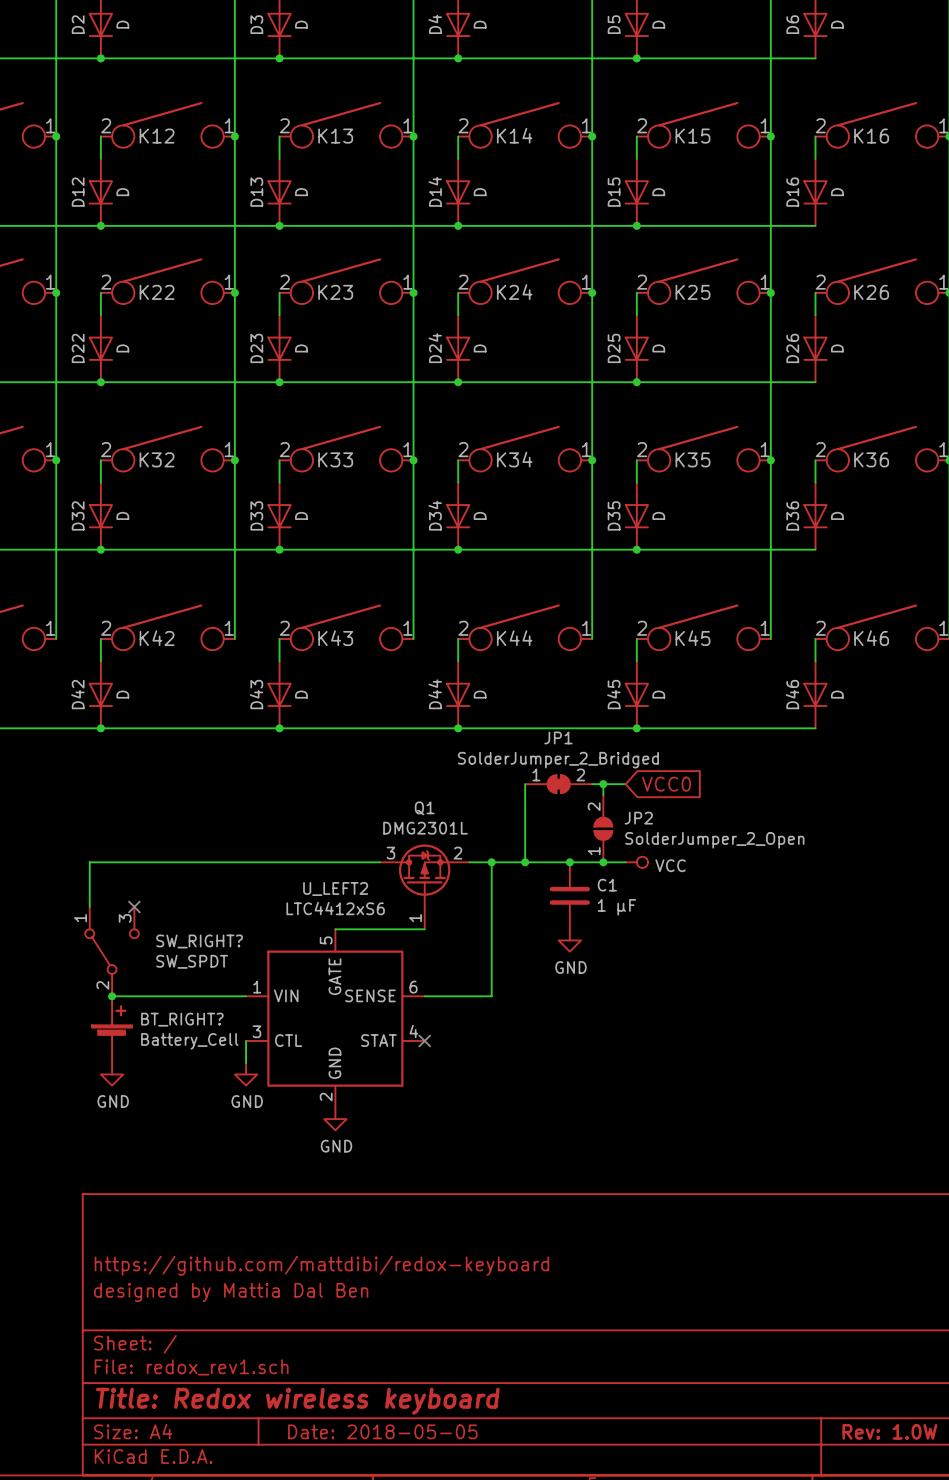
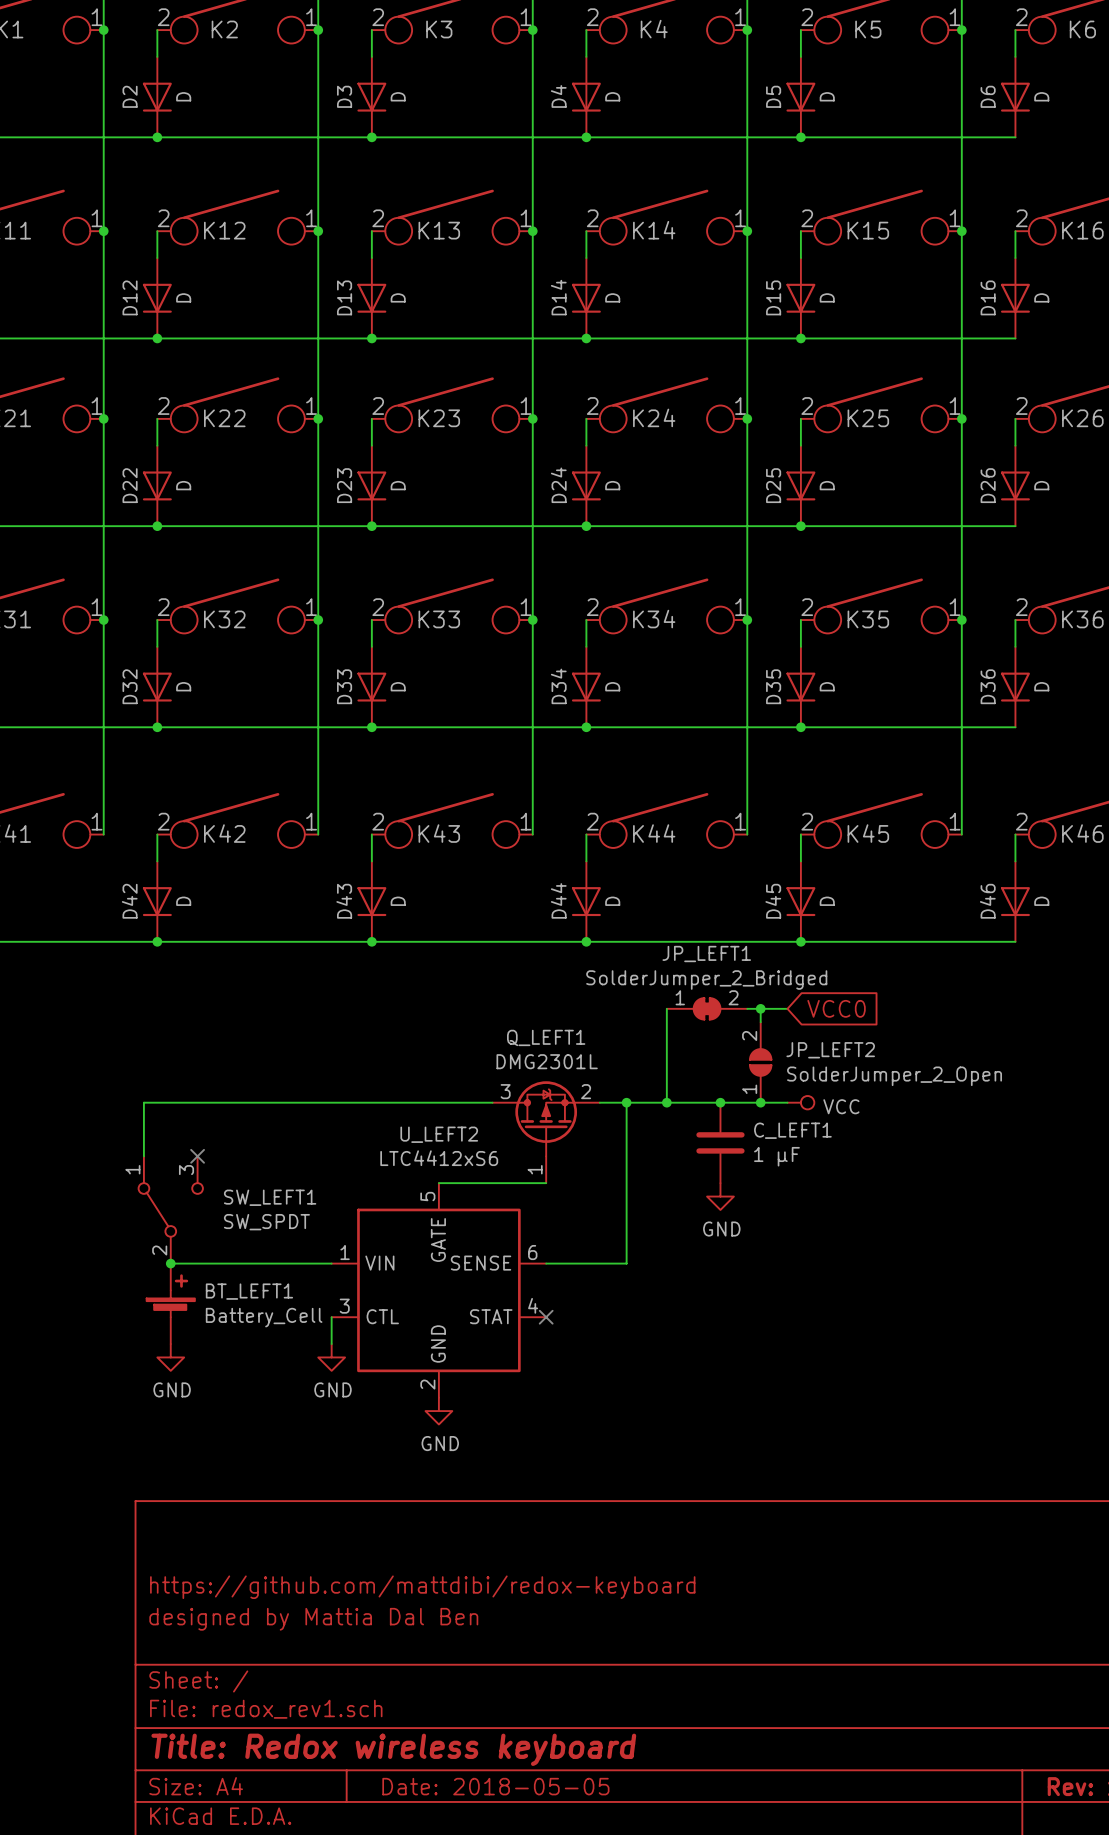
JP1 name: JP1 (558, 737) -> JP_LEFT1 (706, 954)
Q1 name: Q1 (424, 808) -> Q_LEFT1 (546, 1037)
JP2 name: JP2 (638, 818) -> JP_LEFT2 (830, 1050)
C1 name: C1 (607, 885) -> C_LEFT1 (792, 1130)
SW_RIGHT? name: SW_RIGHT? (199, 941) -> SW_LEFT1 (270, 1197)
BT_RIGHT? name: BT_RIGHT? (182, 1019) -> BT_LEFT1 (249, 1291)

